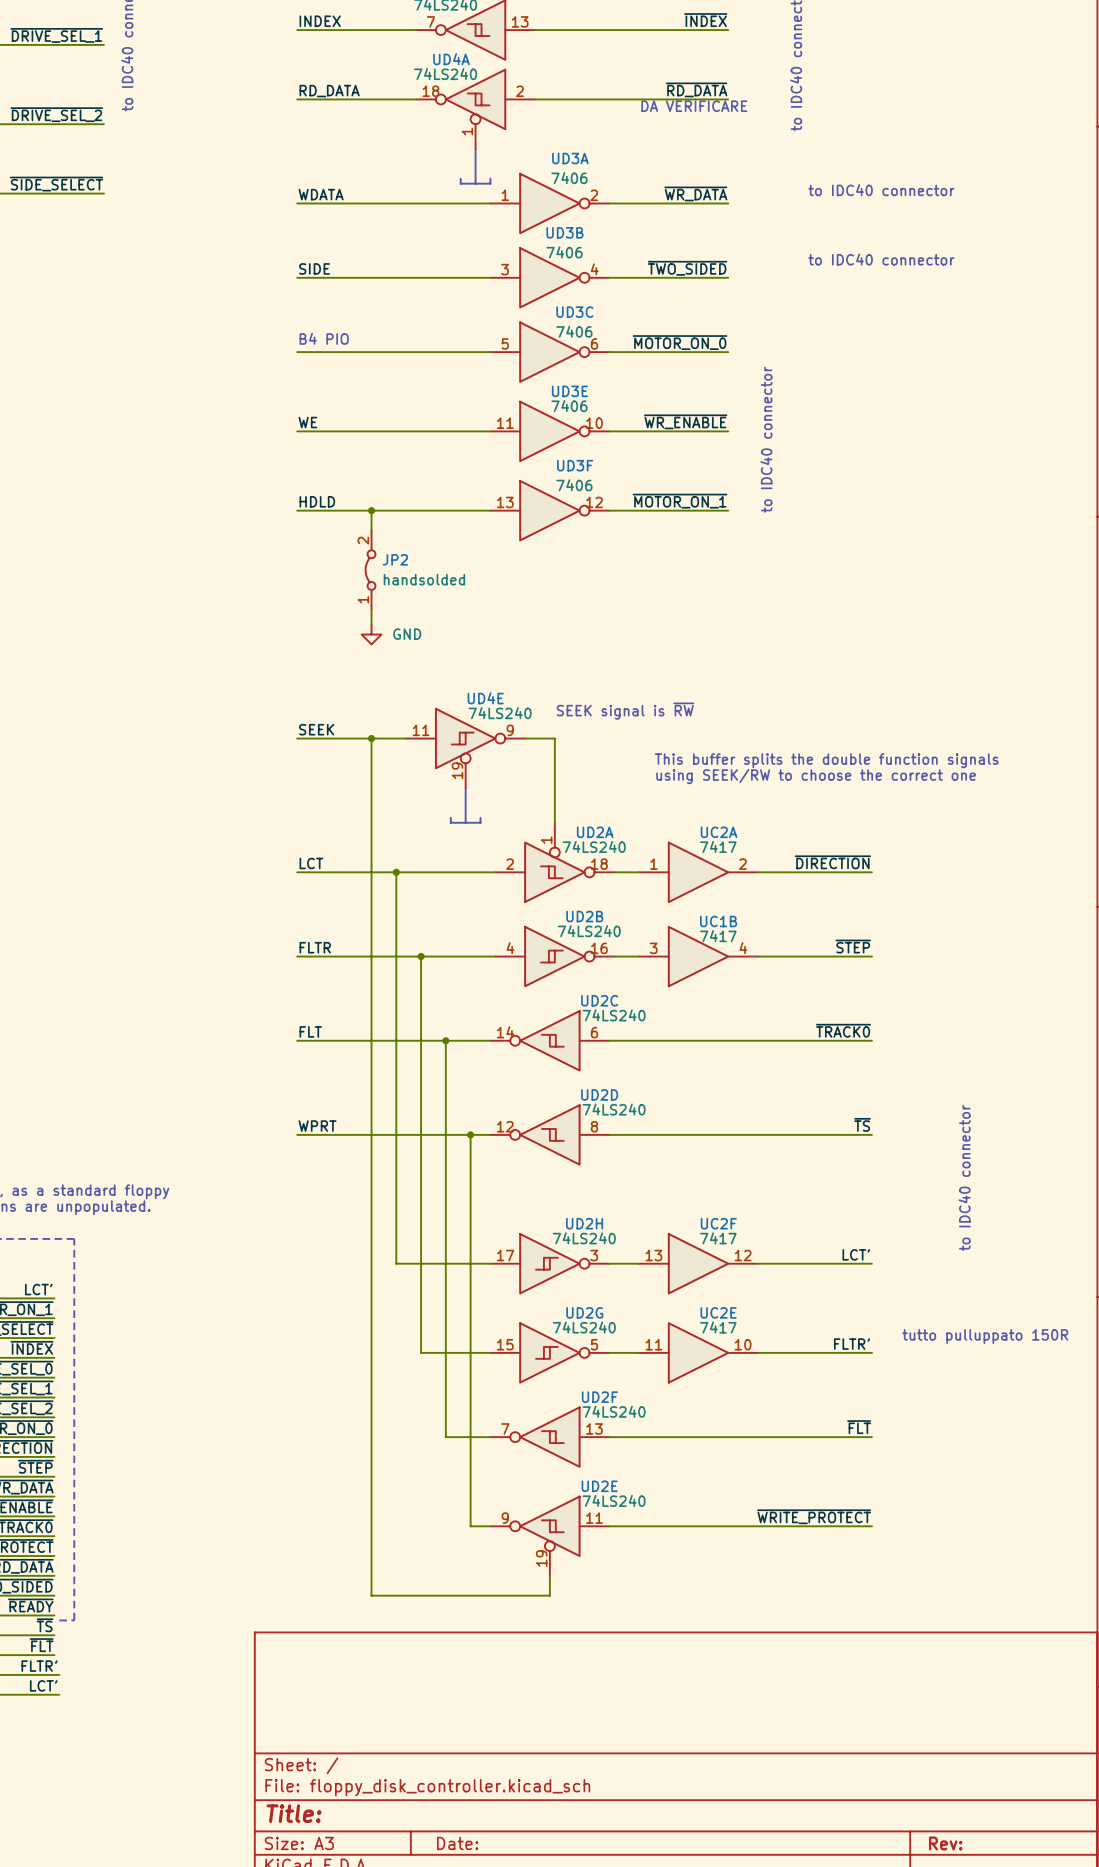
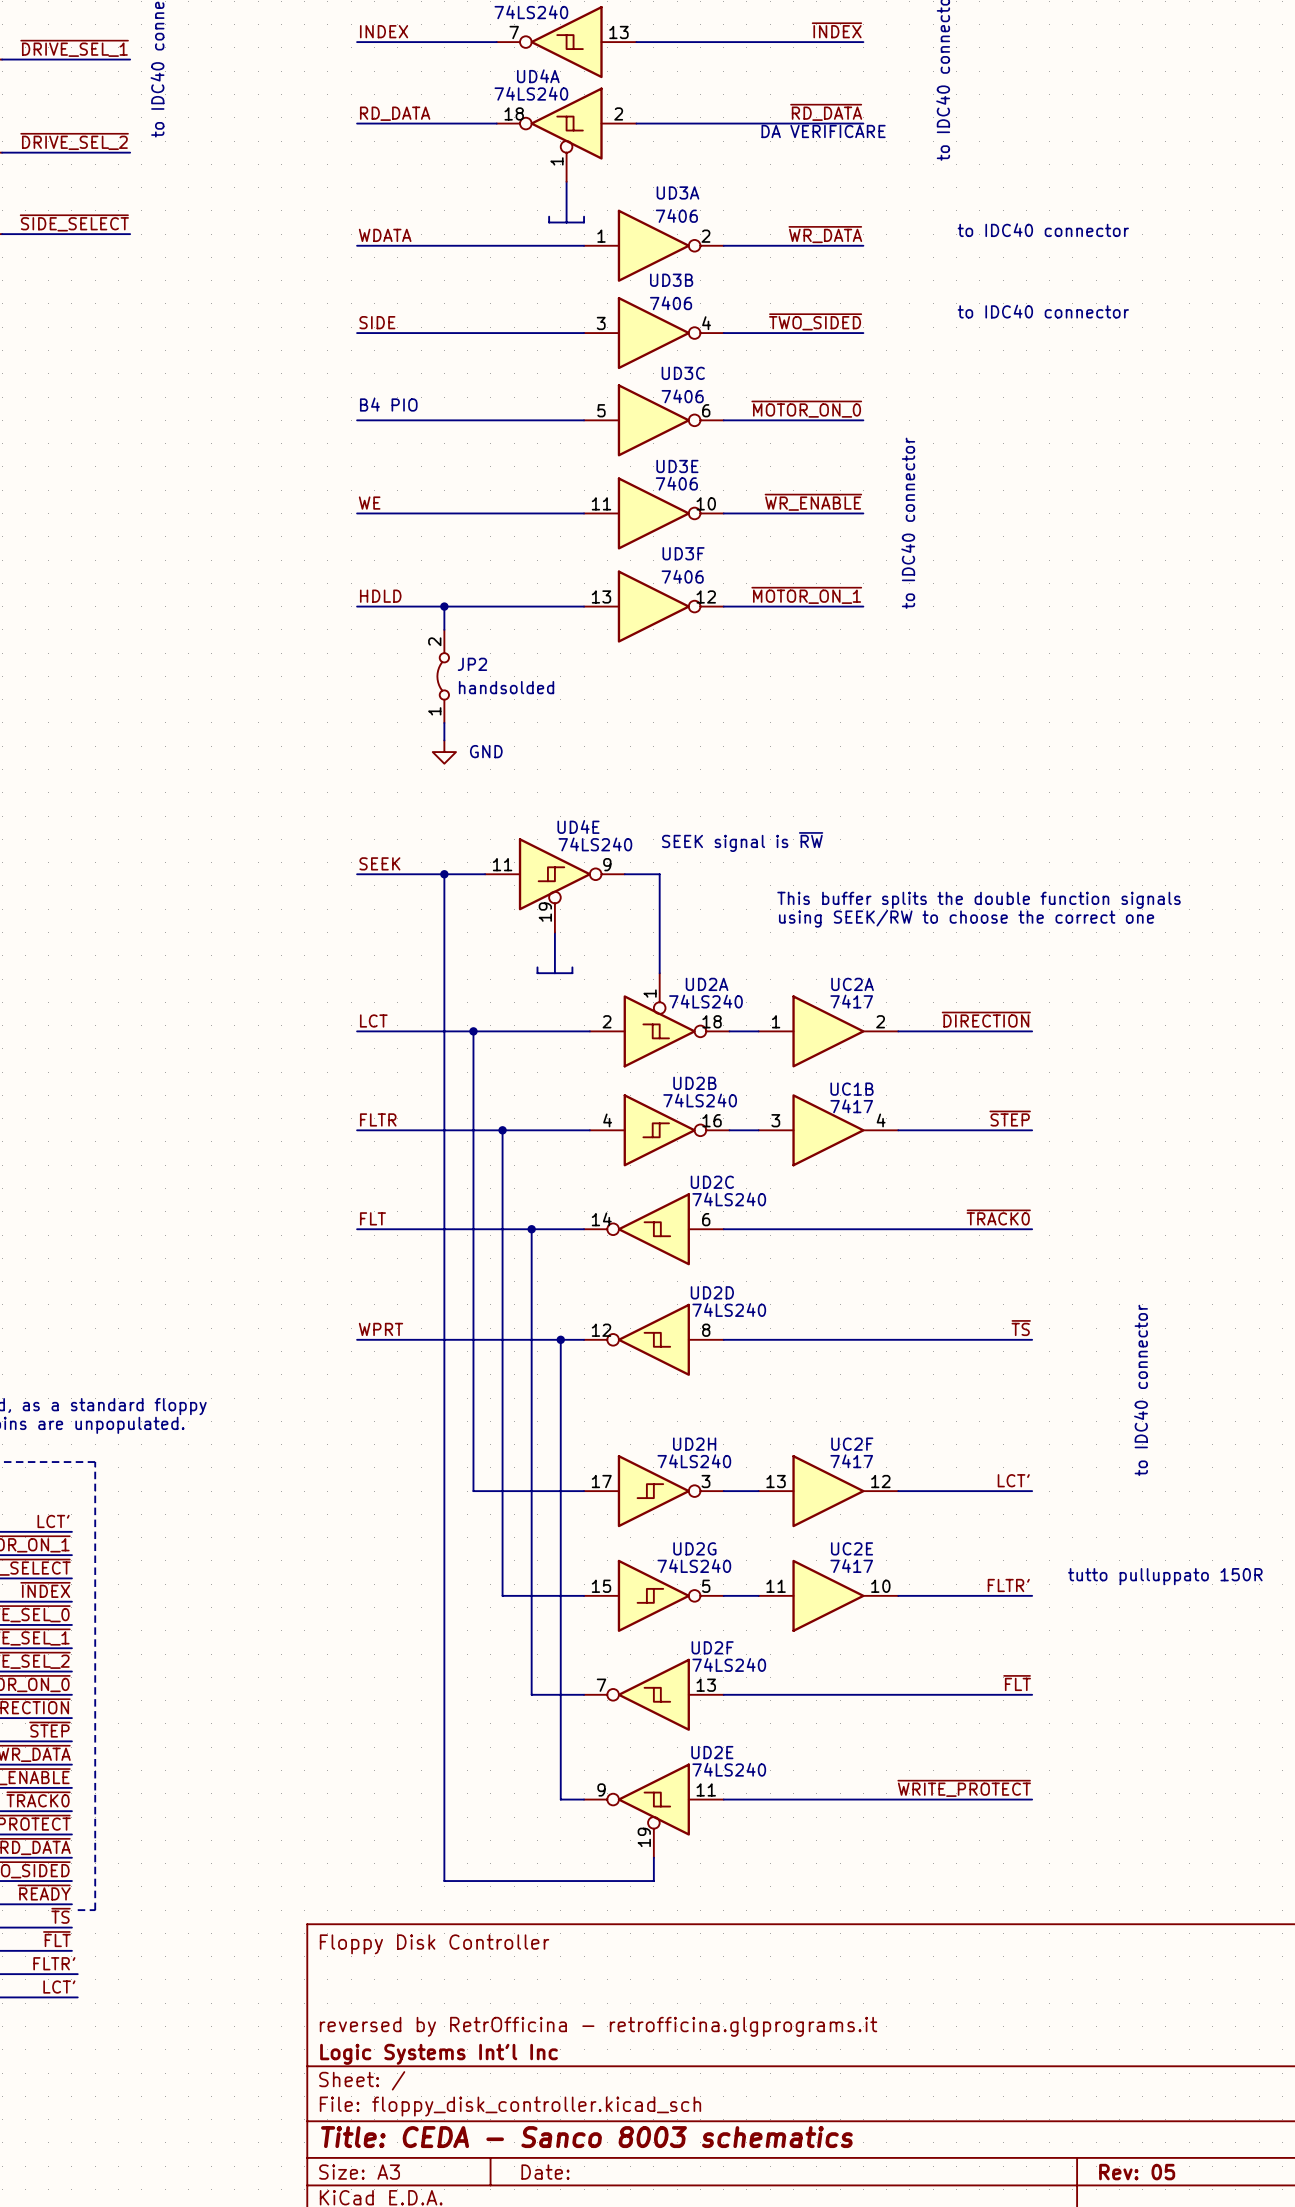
title block: none -> Floppy Disk Controller (434, 1944)
title block: none -> reversed by RetrOfficina - retrofficina.glgprograms.it (598, 2026)
title block: none -> Logic Systems Int'l Inc (439, 2054)
title block: Title: (294, 1813) -> Title: CEDA - Sanco 8003 schematics (586, 2137)
title block: Rev: (945, 1843) -> Rev: 05 (1137, 2172)

